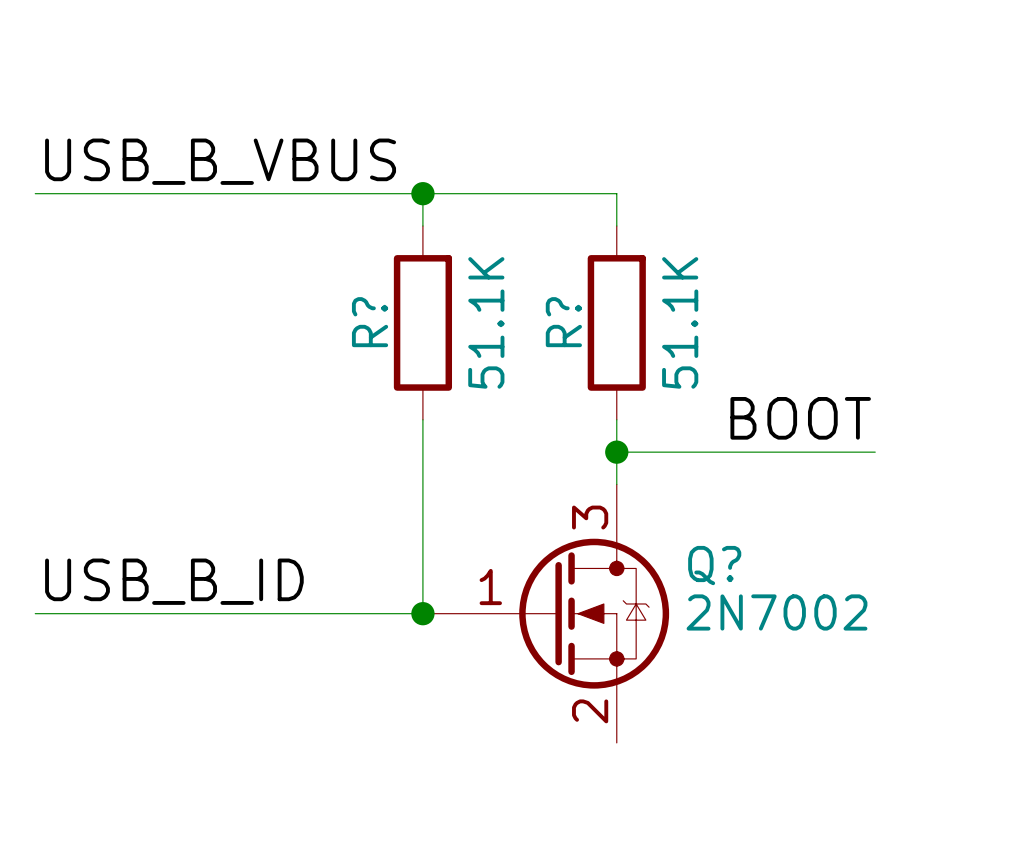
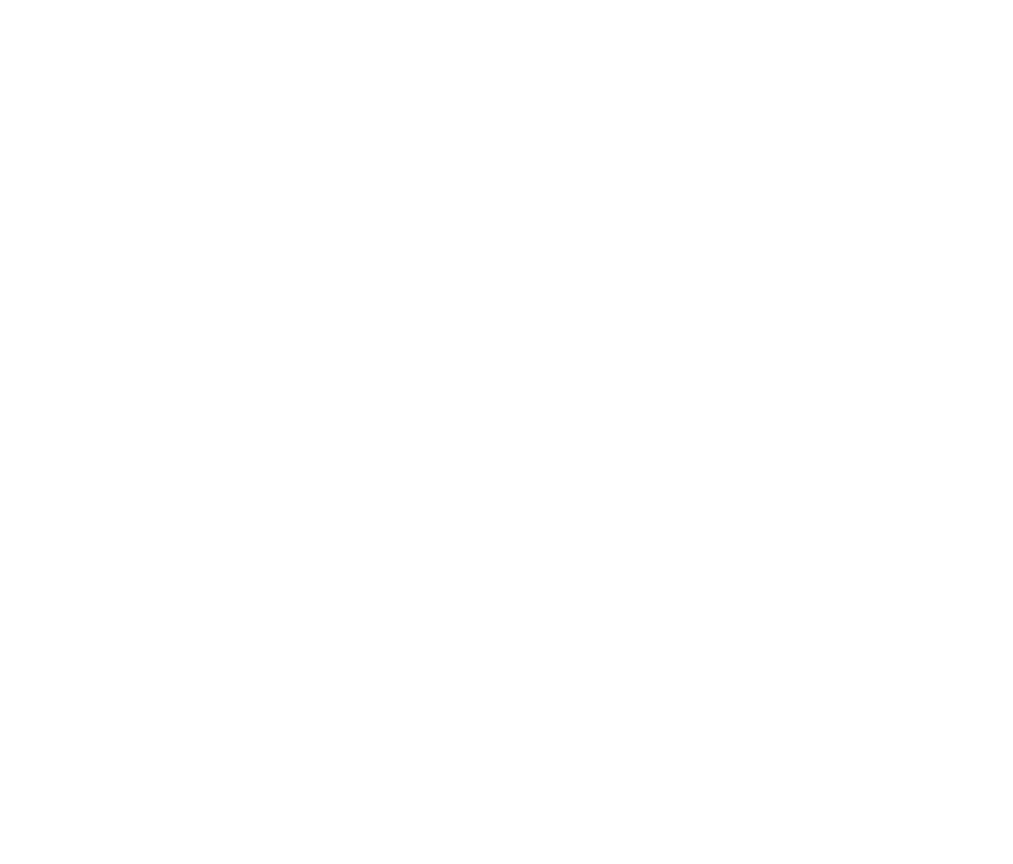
label: USB_B_VBUS (220, 161) -> none
wire: (35, 193) (616, 193) (616, 226) -> none
wire: (422, 193) (422, 226) -> none
junction: (422, 193) -> none
R?: 51.1K (422, 322) -> none
R?: 51.1K (616, 322) -> none
label: BOOT (800, 418) -> none
wire: (422, 419) (422, 613) (35, 613) -> none
wire: (616, 419) (616, 484) -> none
wire: (616, 452) (875, 452) -> none
junction: (616, 452) -> none
label: USB_B_ID (174, 581) -> none
junction: (422, 613) -> none
Q?: 2N7002 (546, 613) -> none

